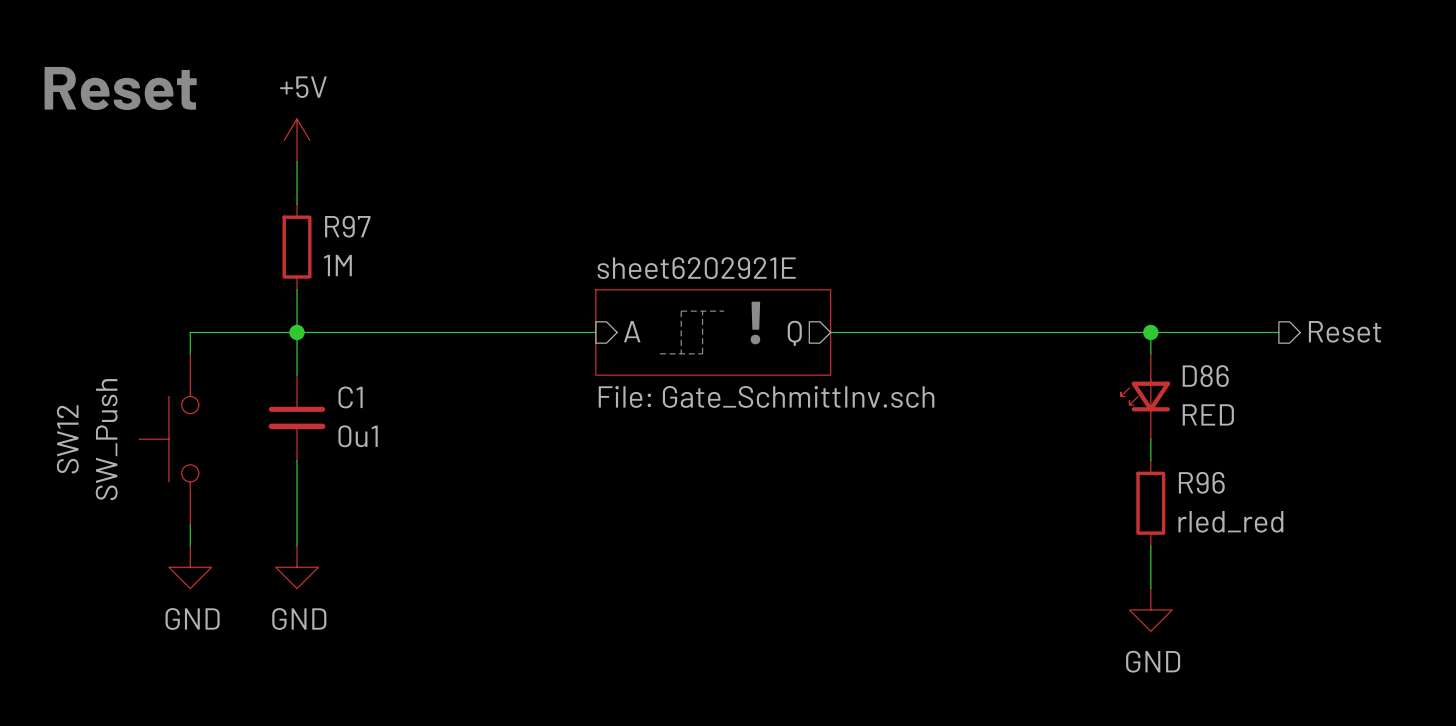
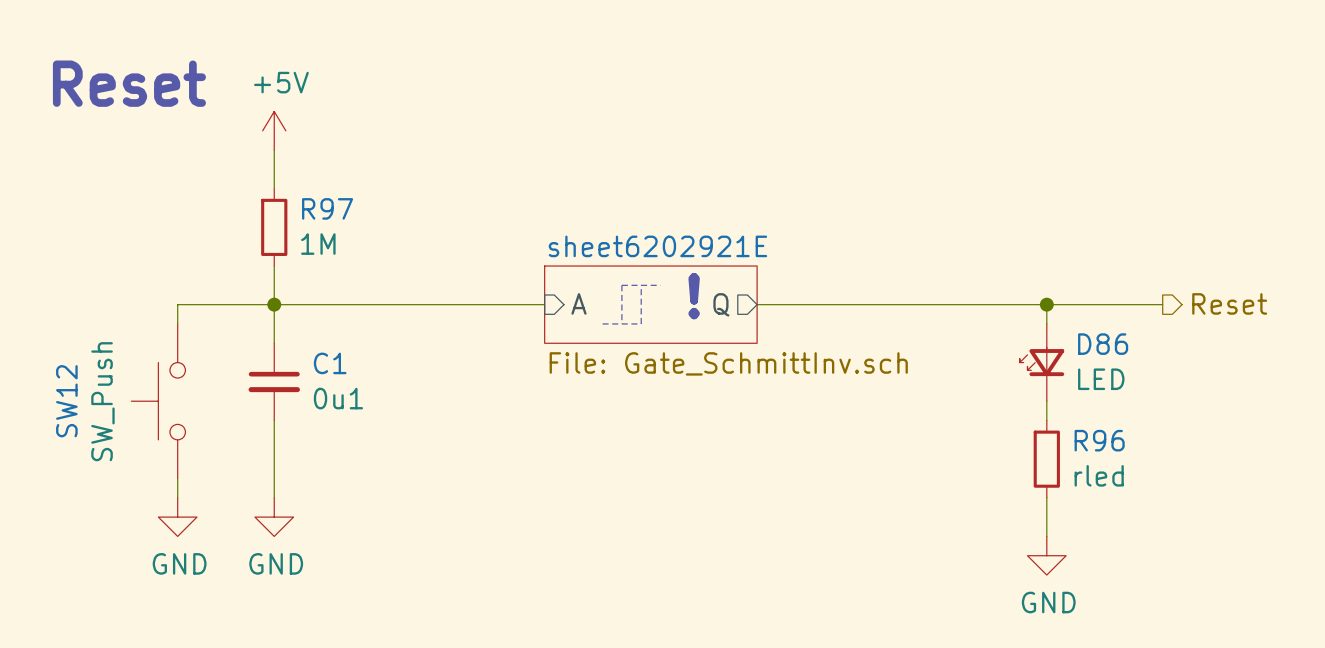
D86 value: RED (1208, 414) -> LED (1101, 379)
R96 value: rled_red (1230, 521) -> rled (1099, 475)

